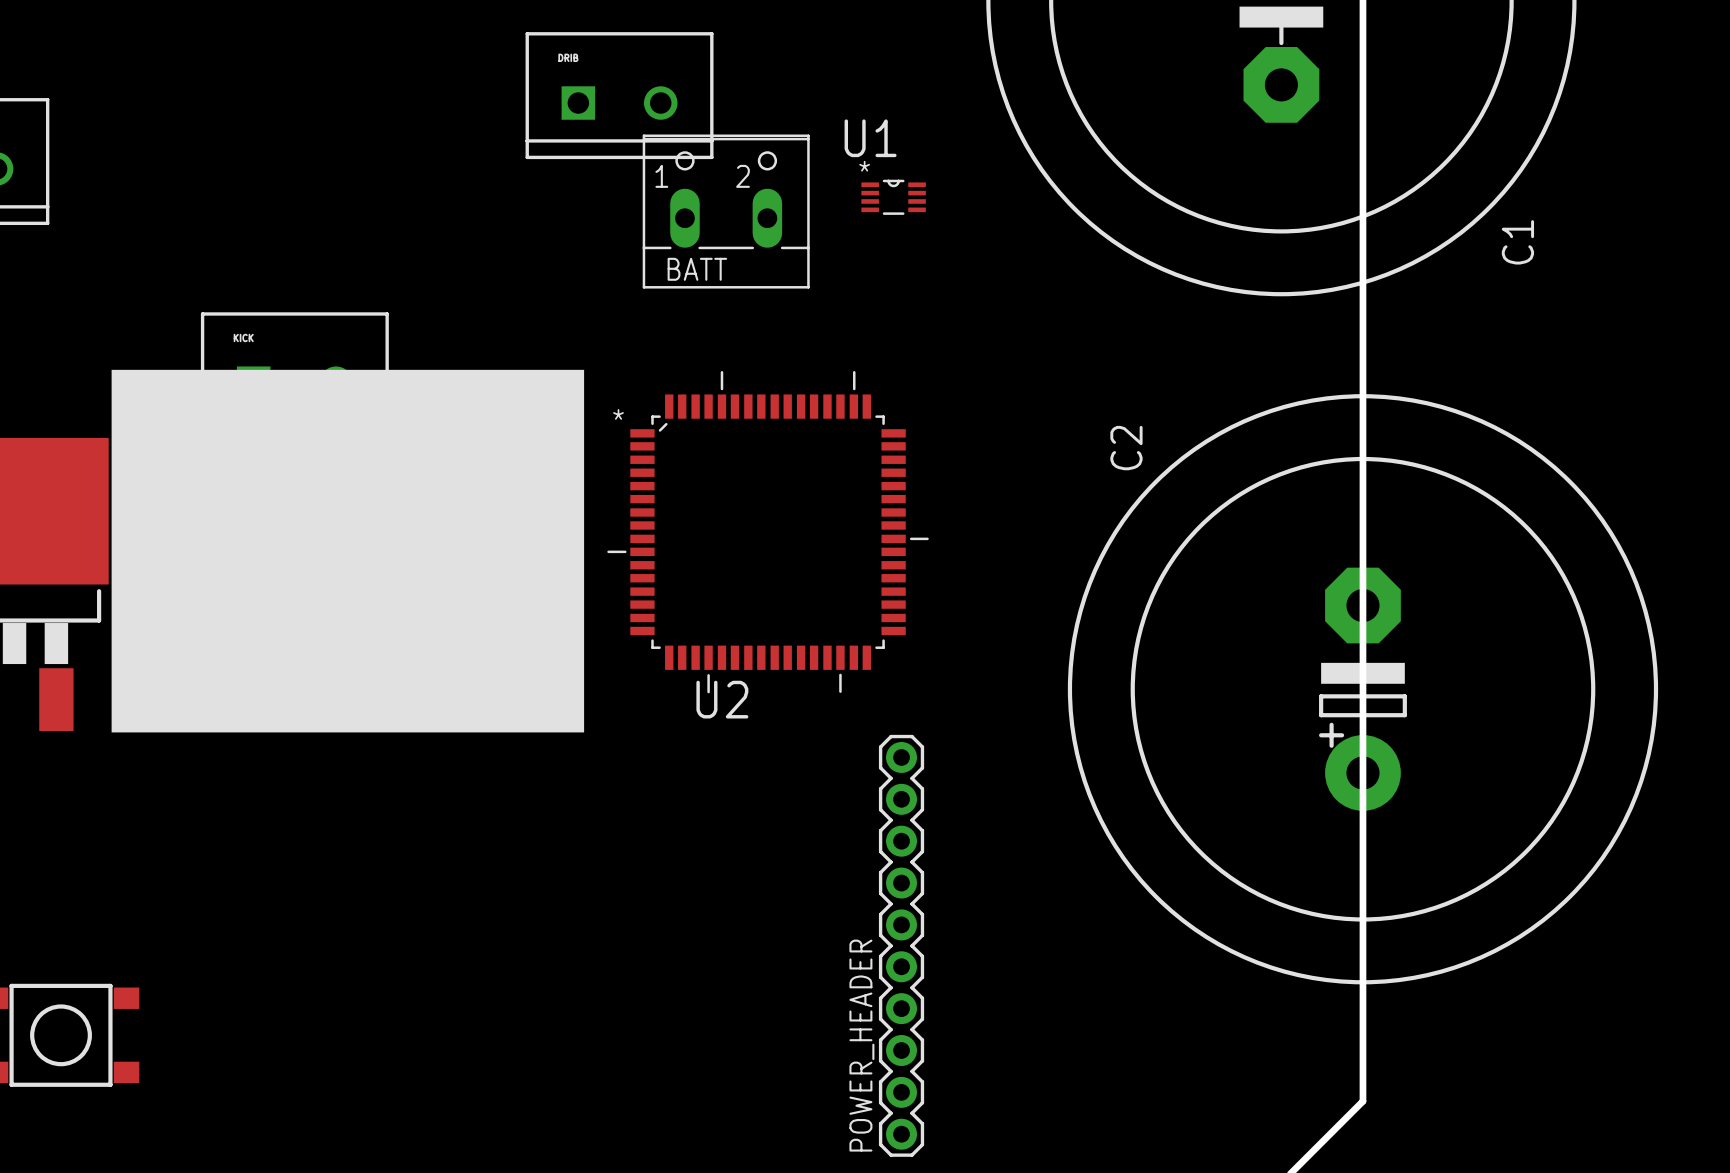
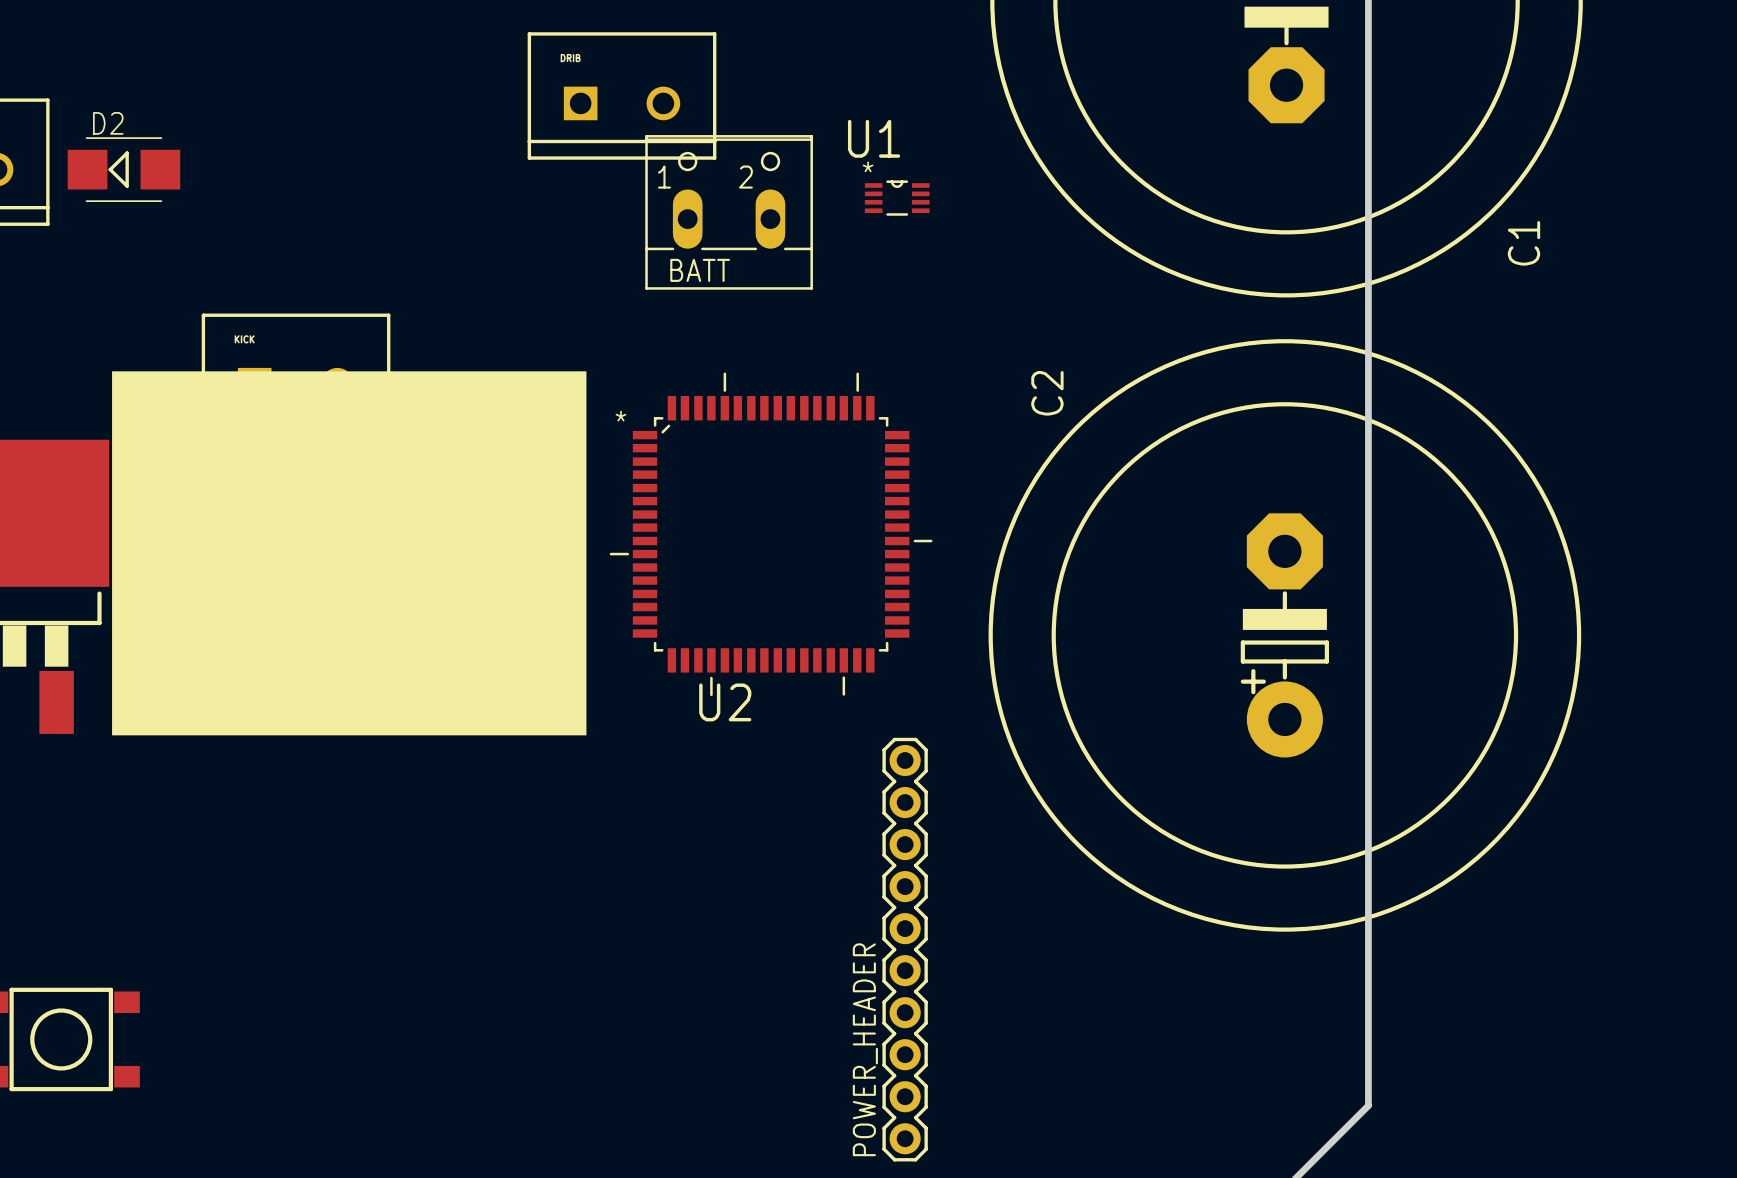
D2: none -> (123, 169)
C2 position: (1362, 689) -> (1284, 635)

